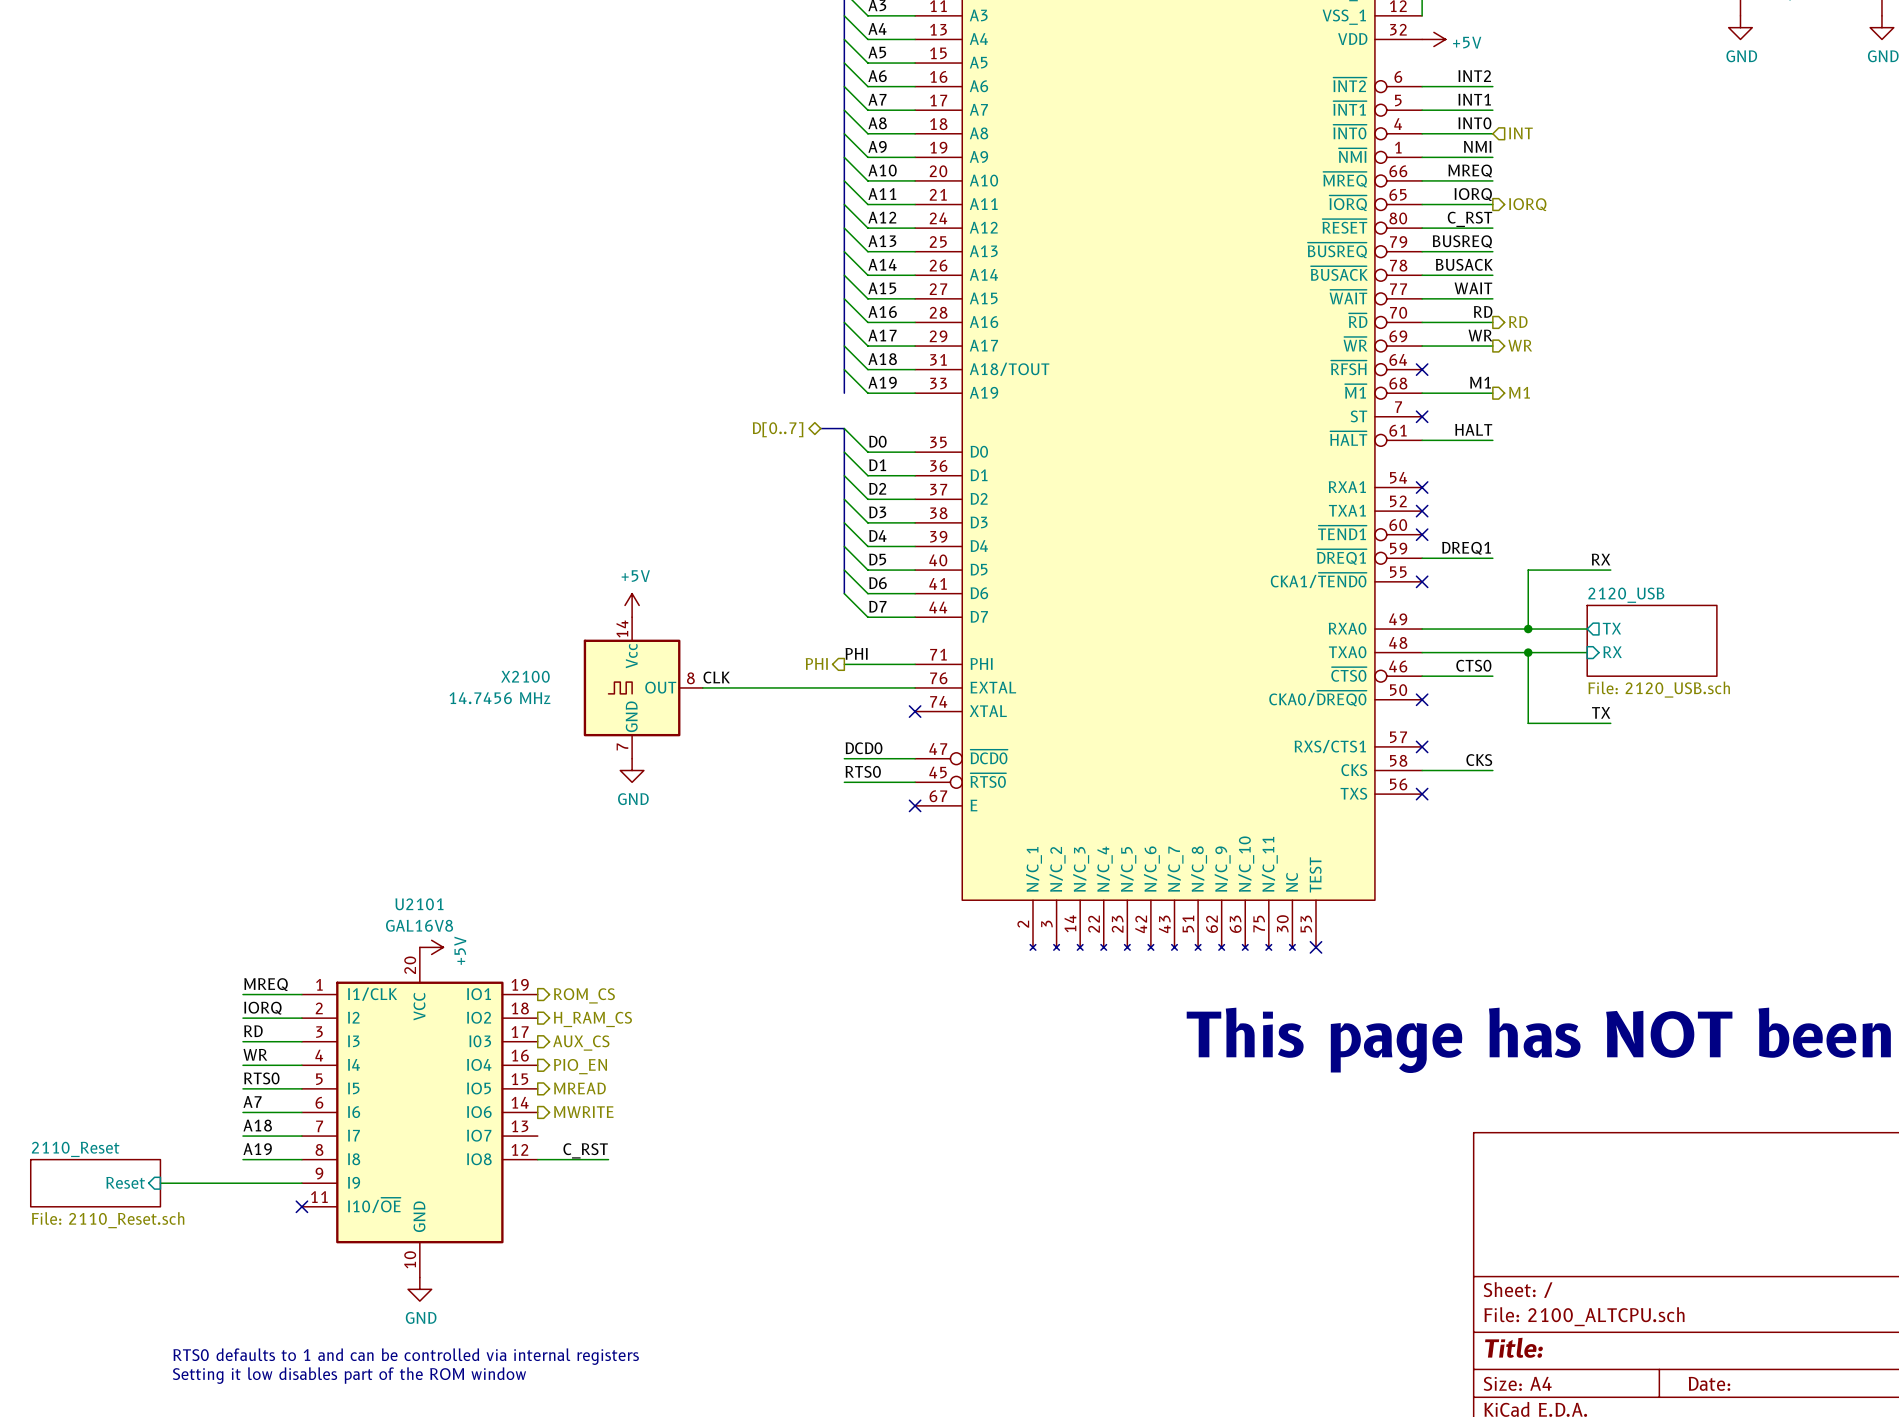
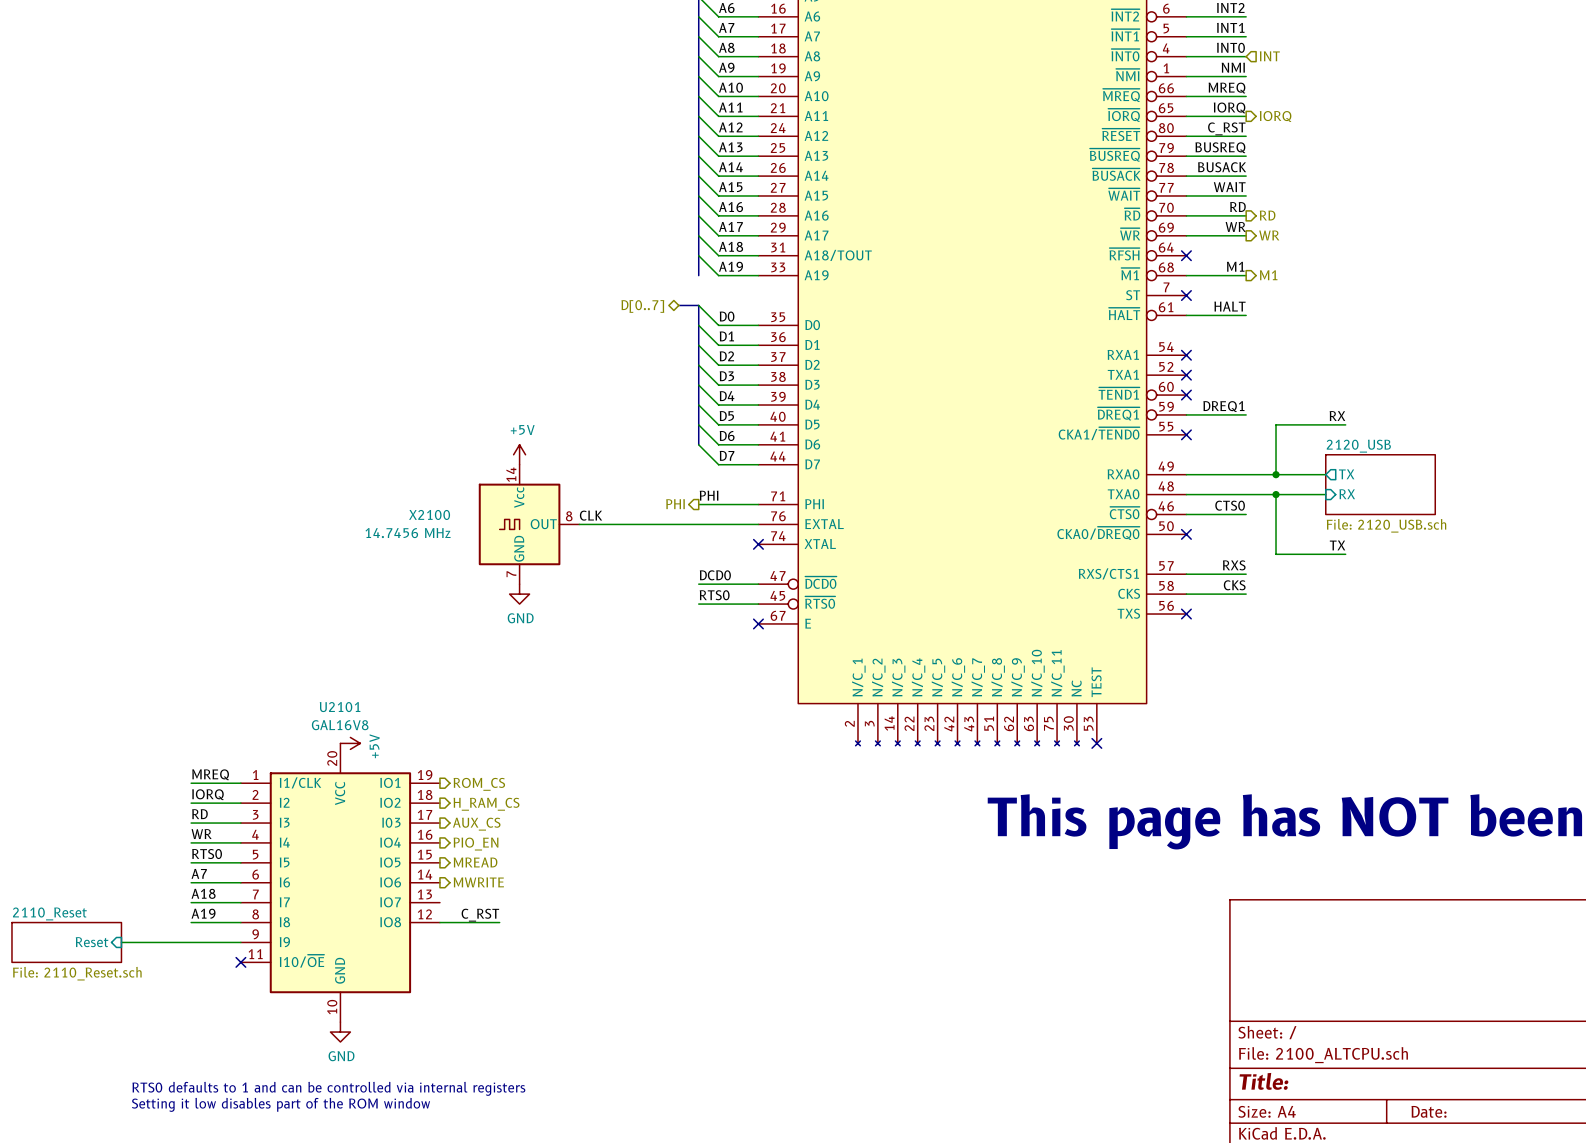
label: none -> RXS (1234, 565)
wire: none -> (1186, 574) (1246, 574)
no-connect mark: (1422, 746) -> none

